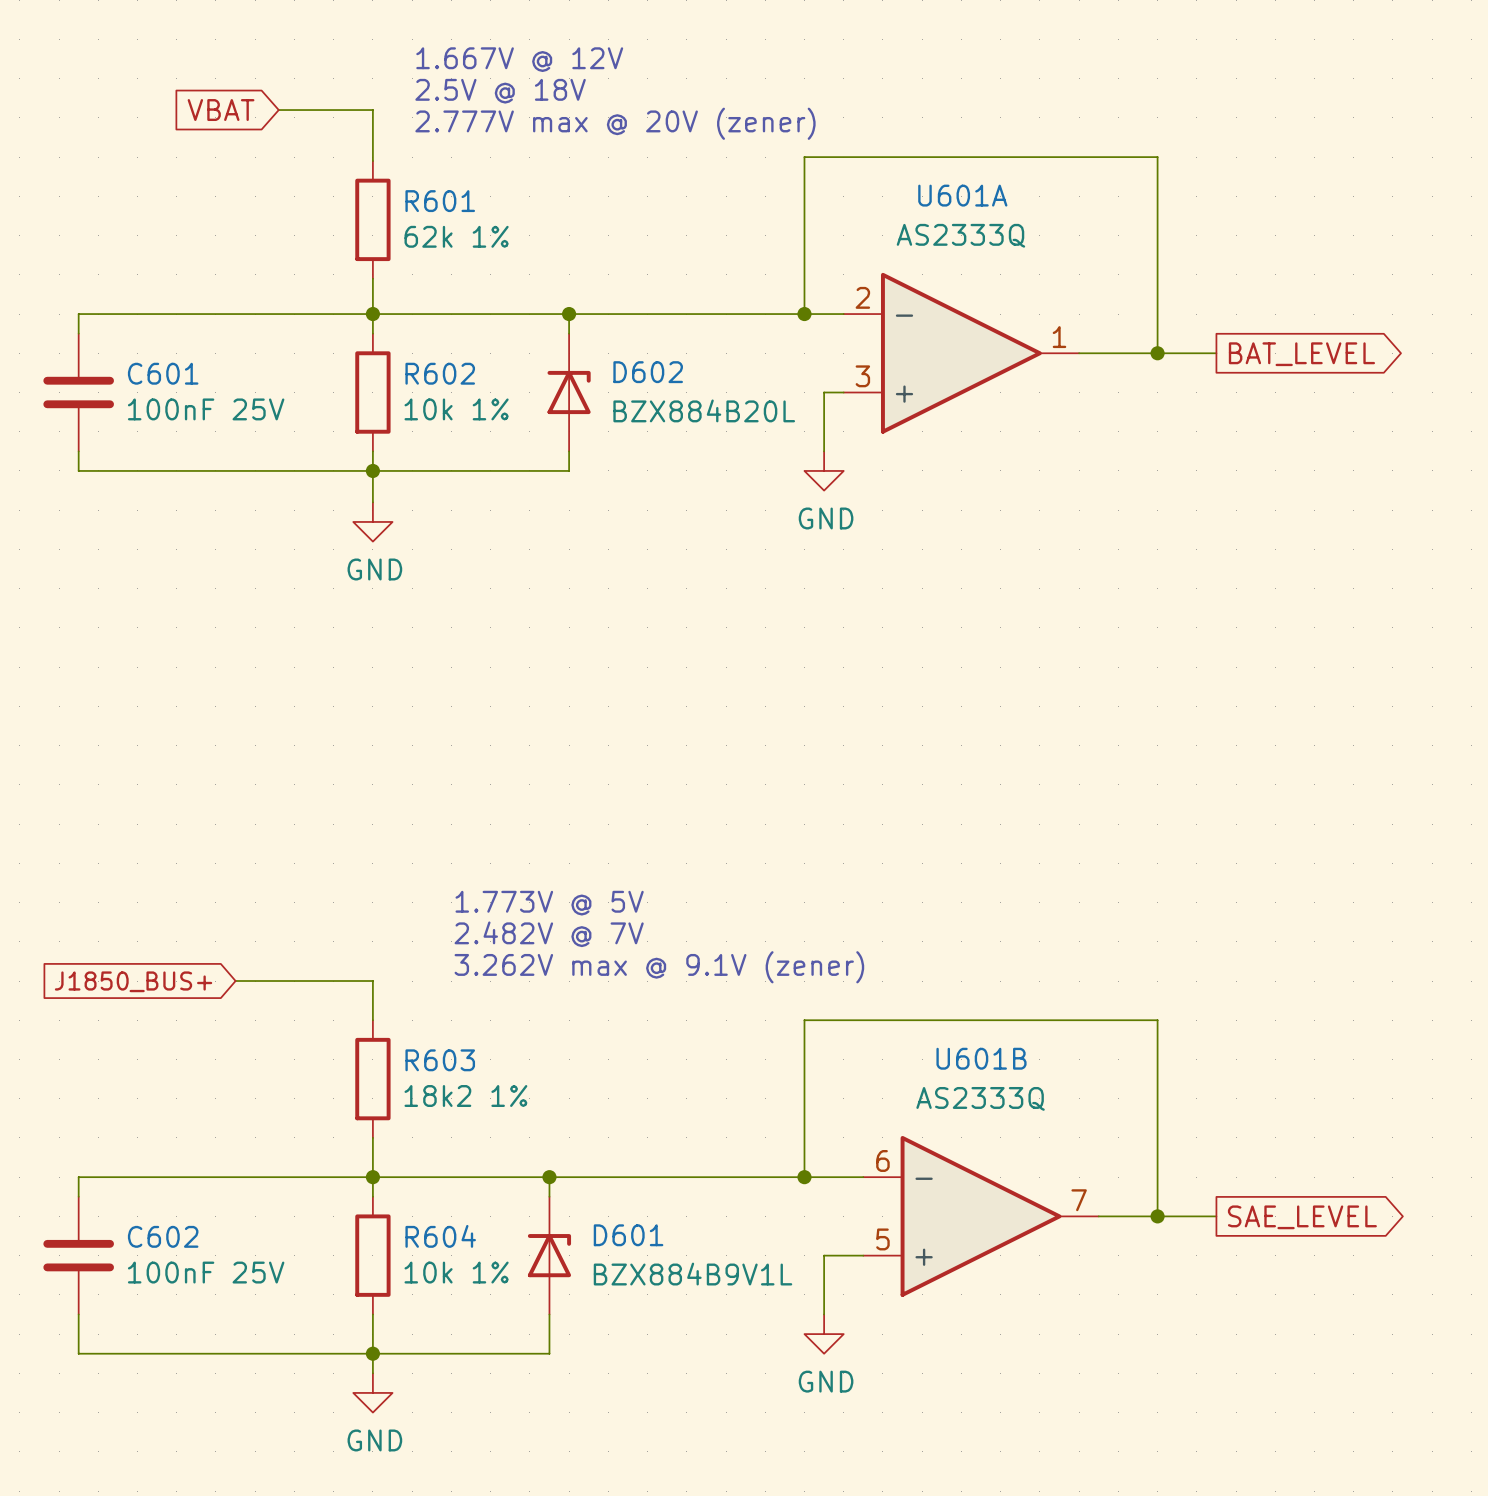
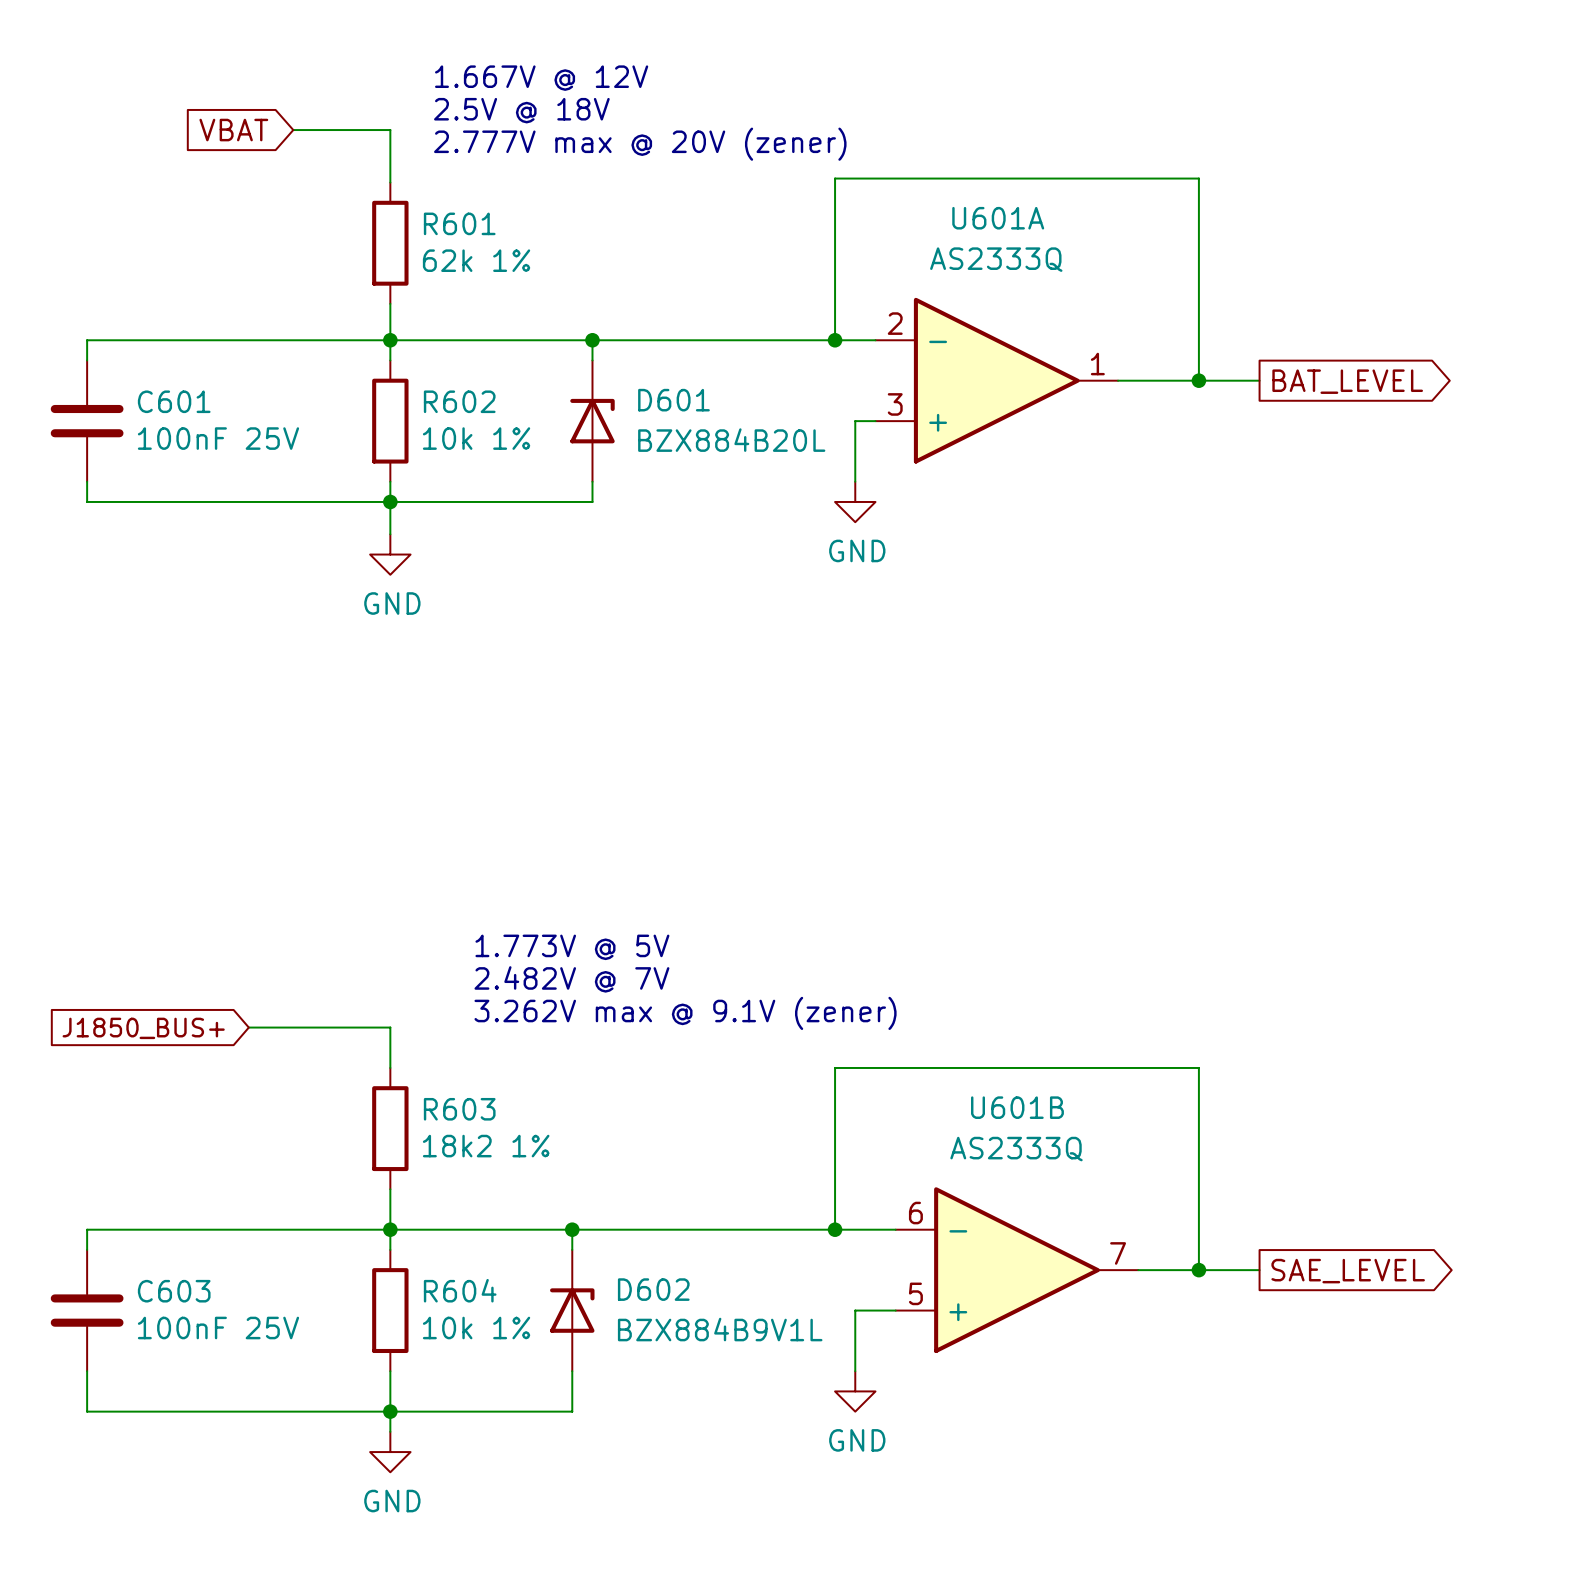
D602 name: D602 (648, 372) -> D601 (673, 400)
D601 name: D601 (628, 1235) -> D602 (653, 1289)
C602 name: C602 (163, 1236) -> C603 (174, 1291)

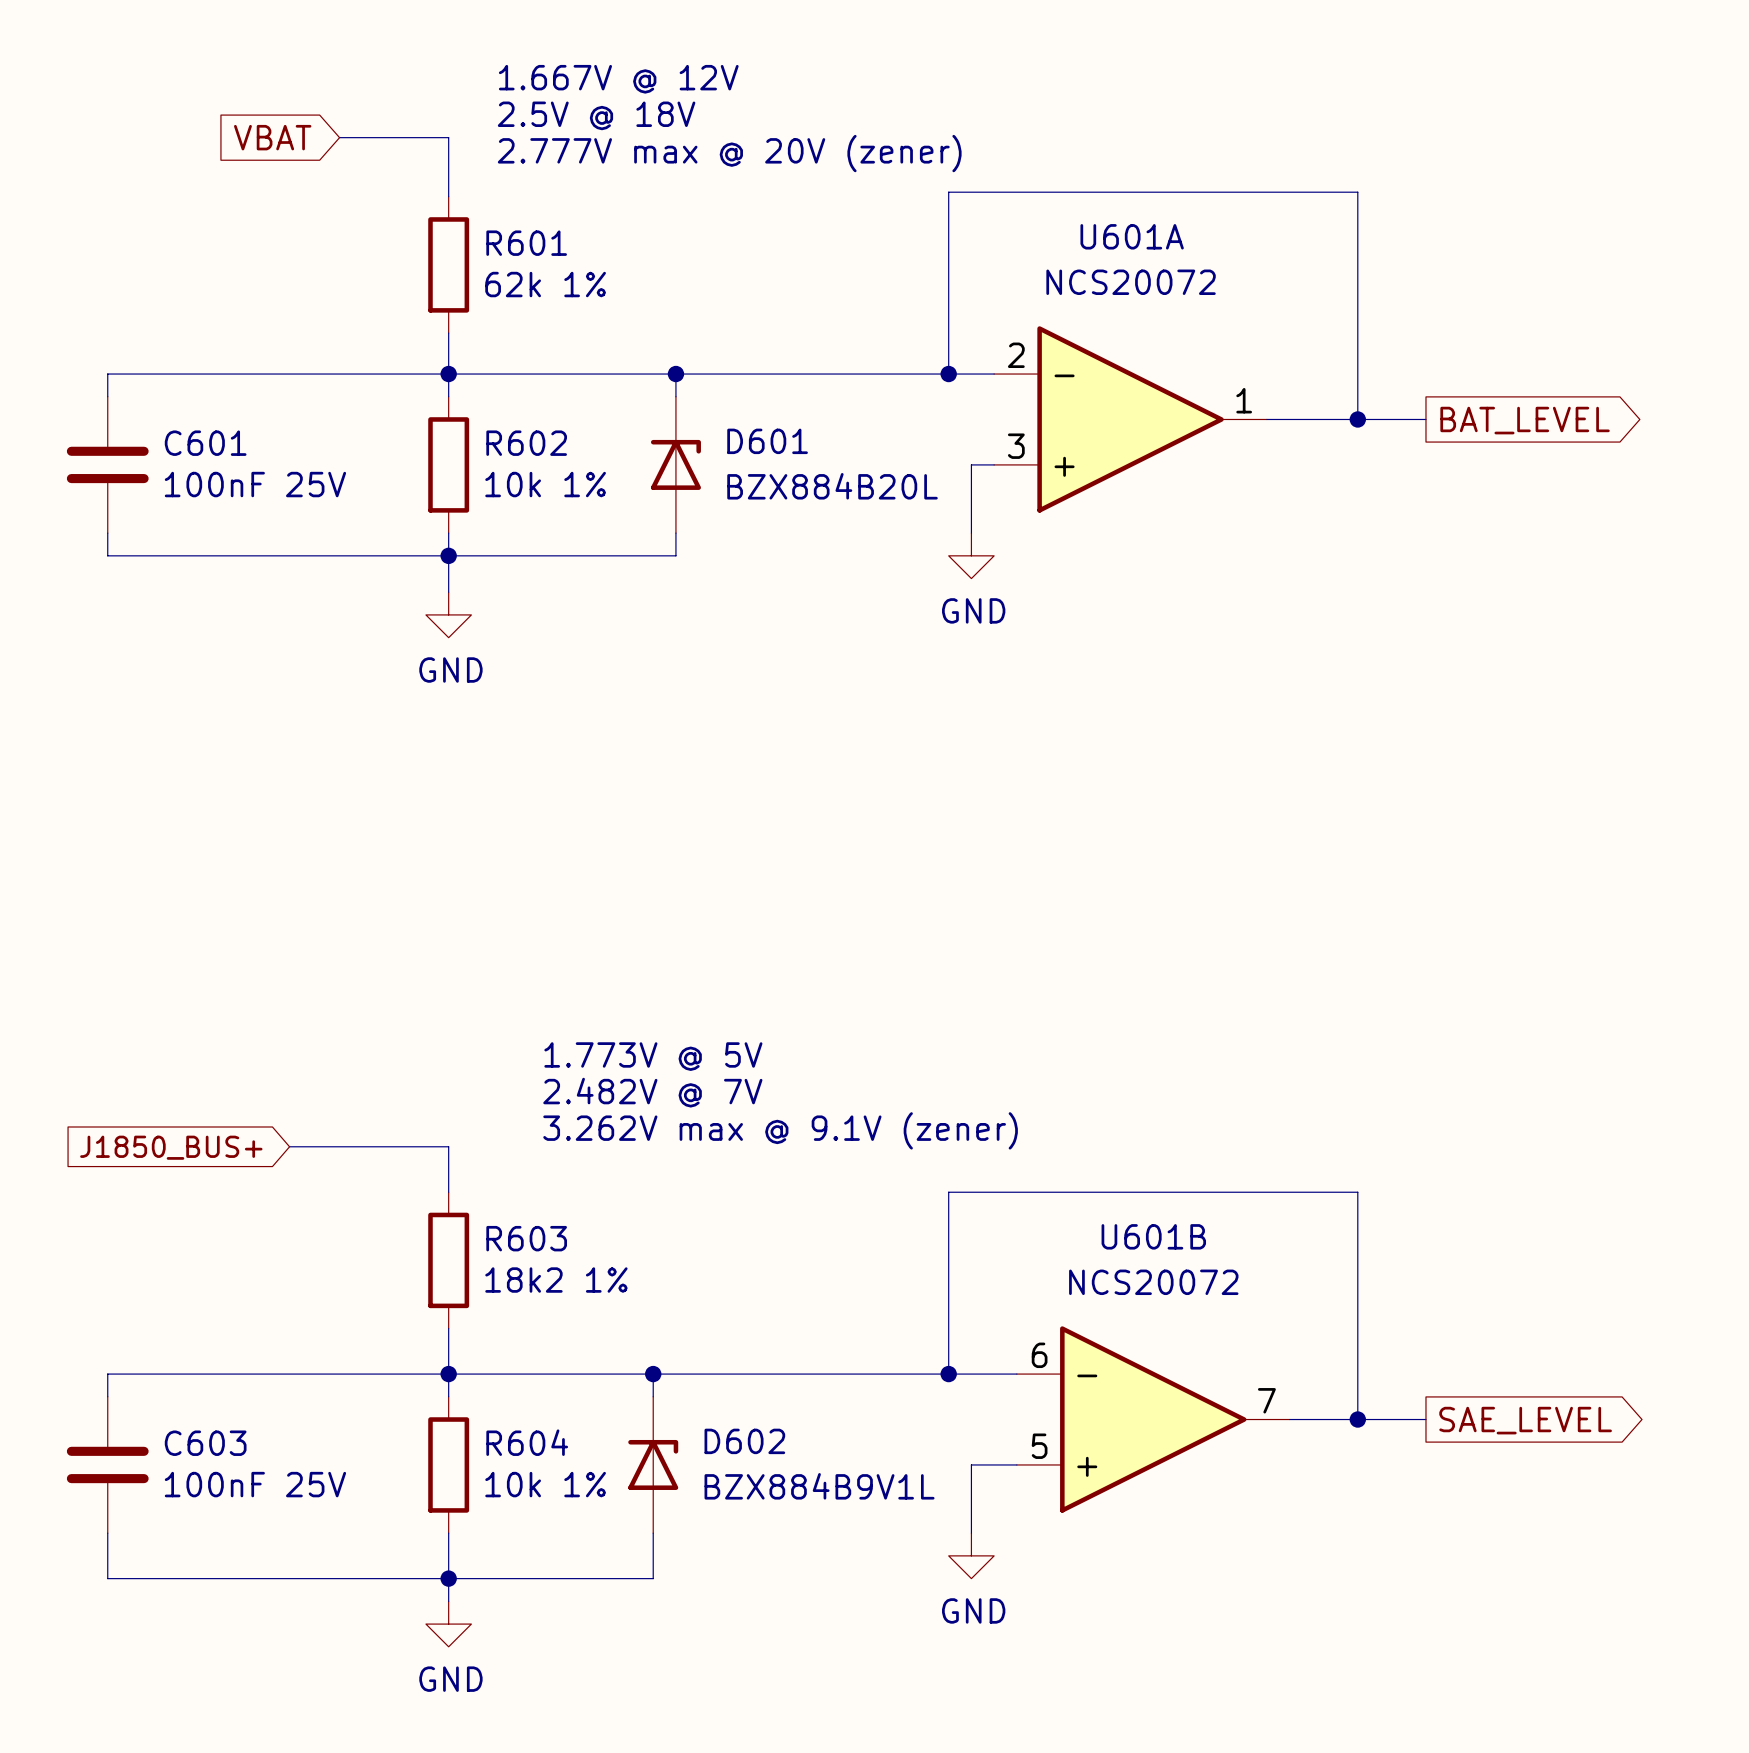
U601A value: AS2333Q (996, 259) -> NCS20072 (1131, 282)
U601B value: AS2333Q (1016, 1149) -> NCS20072 (1153, 1282)

